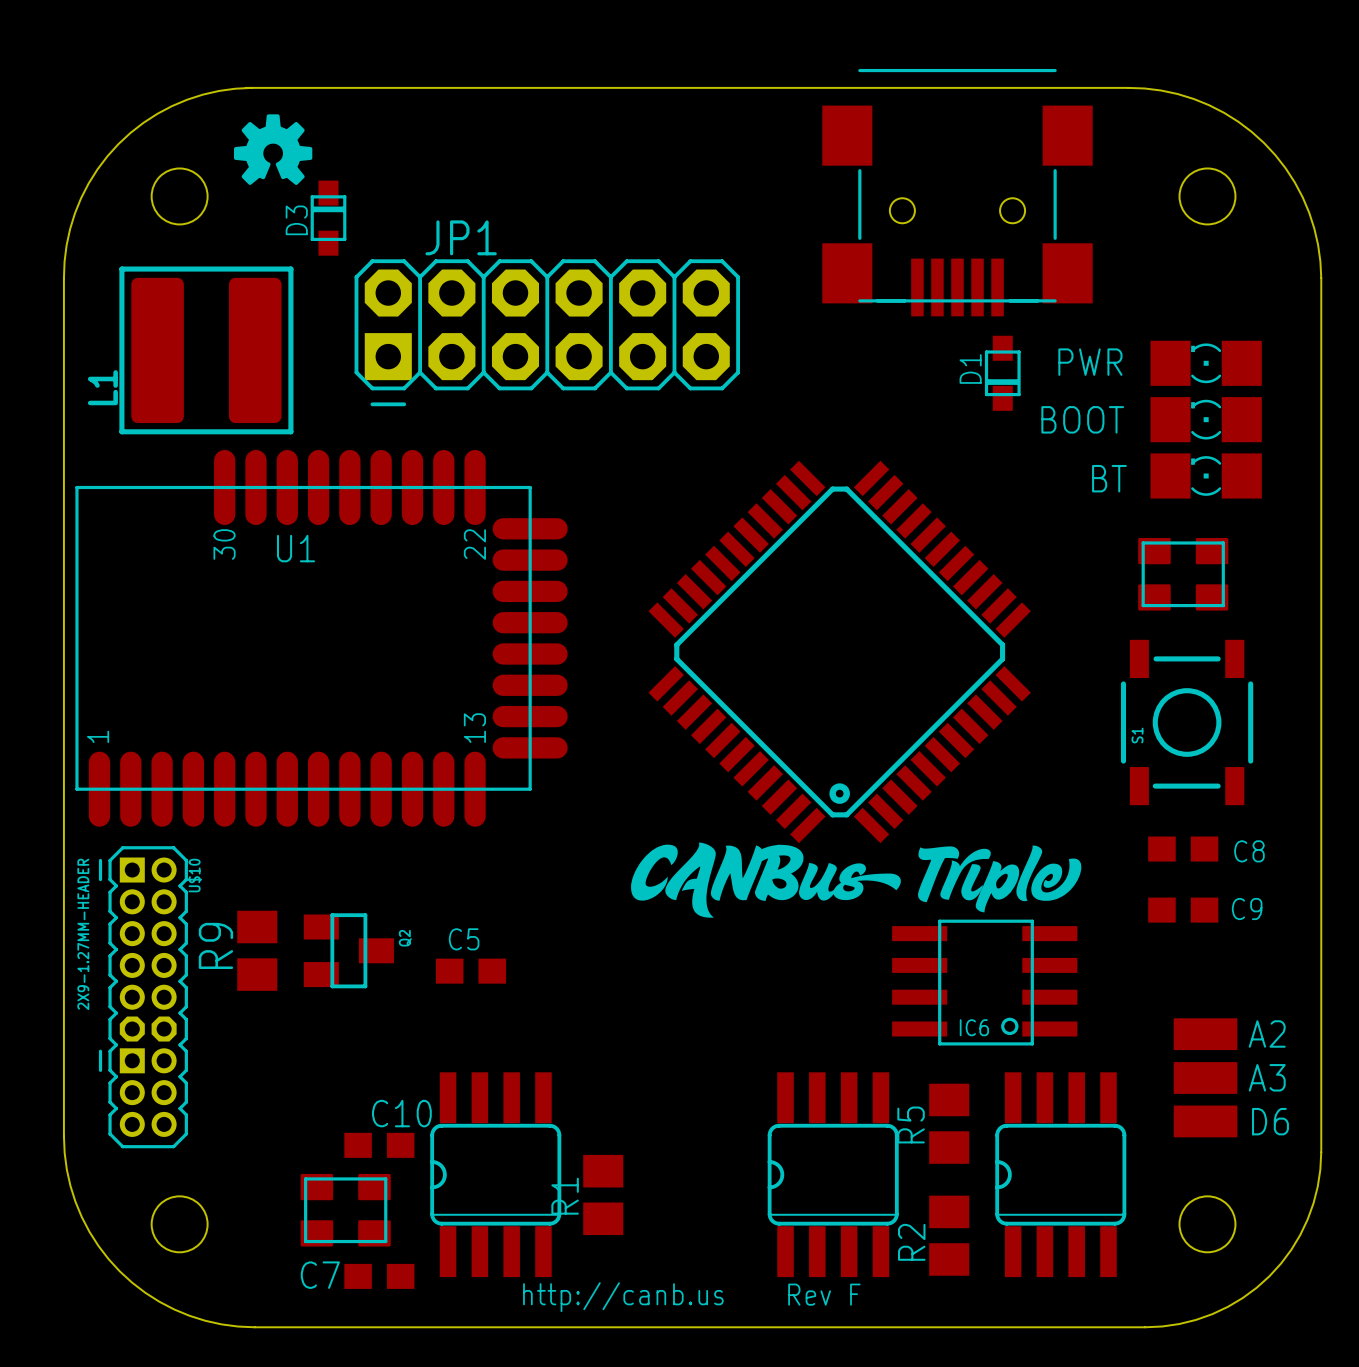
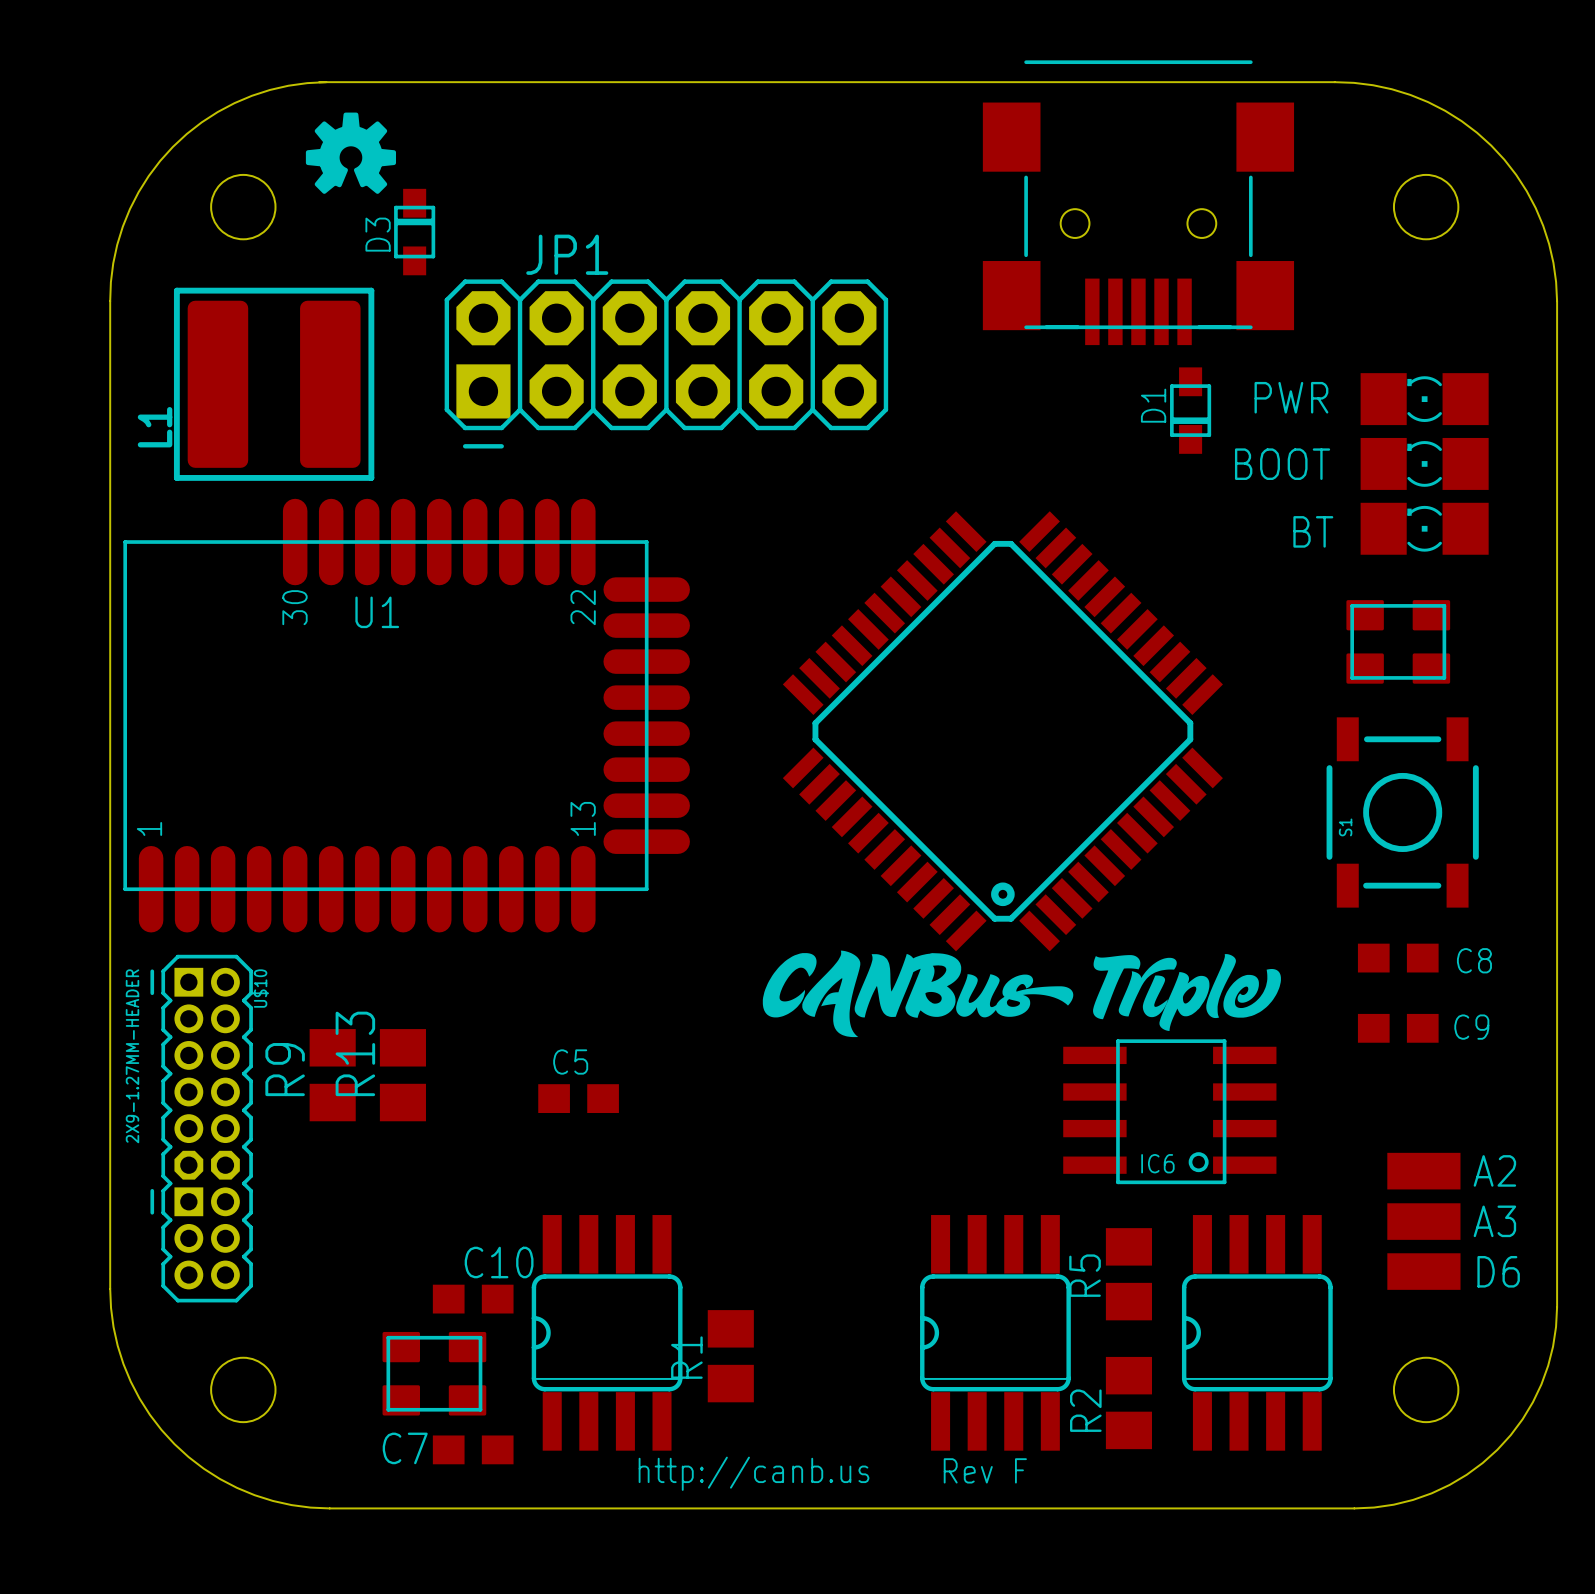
R13: none -> (402, 1075)
Q2: (348, 950) -> none

